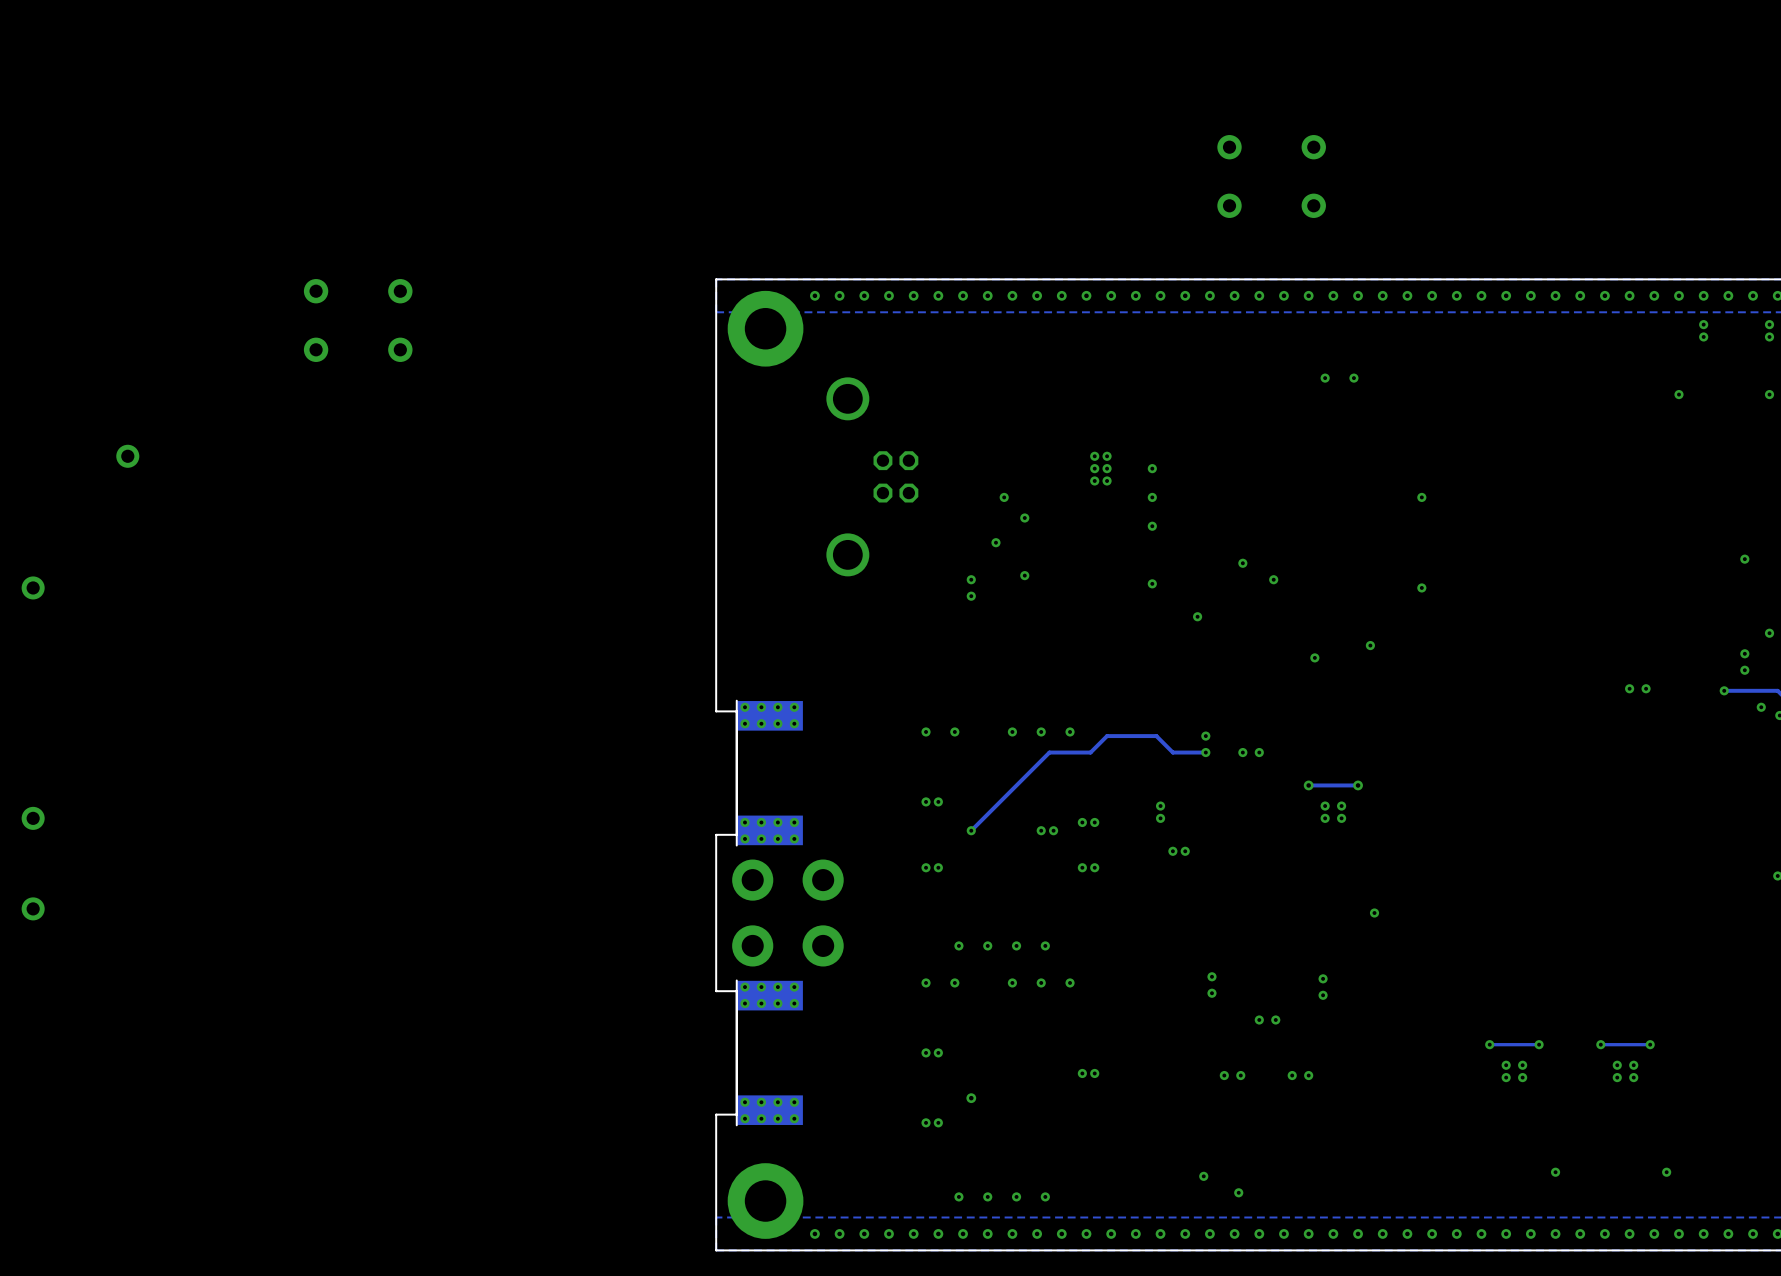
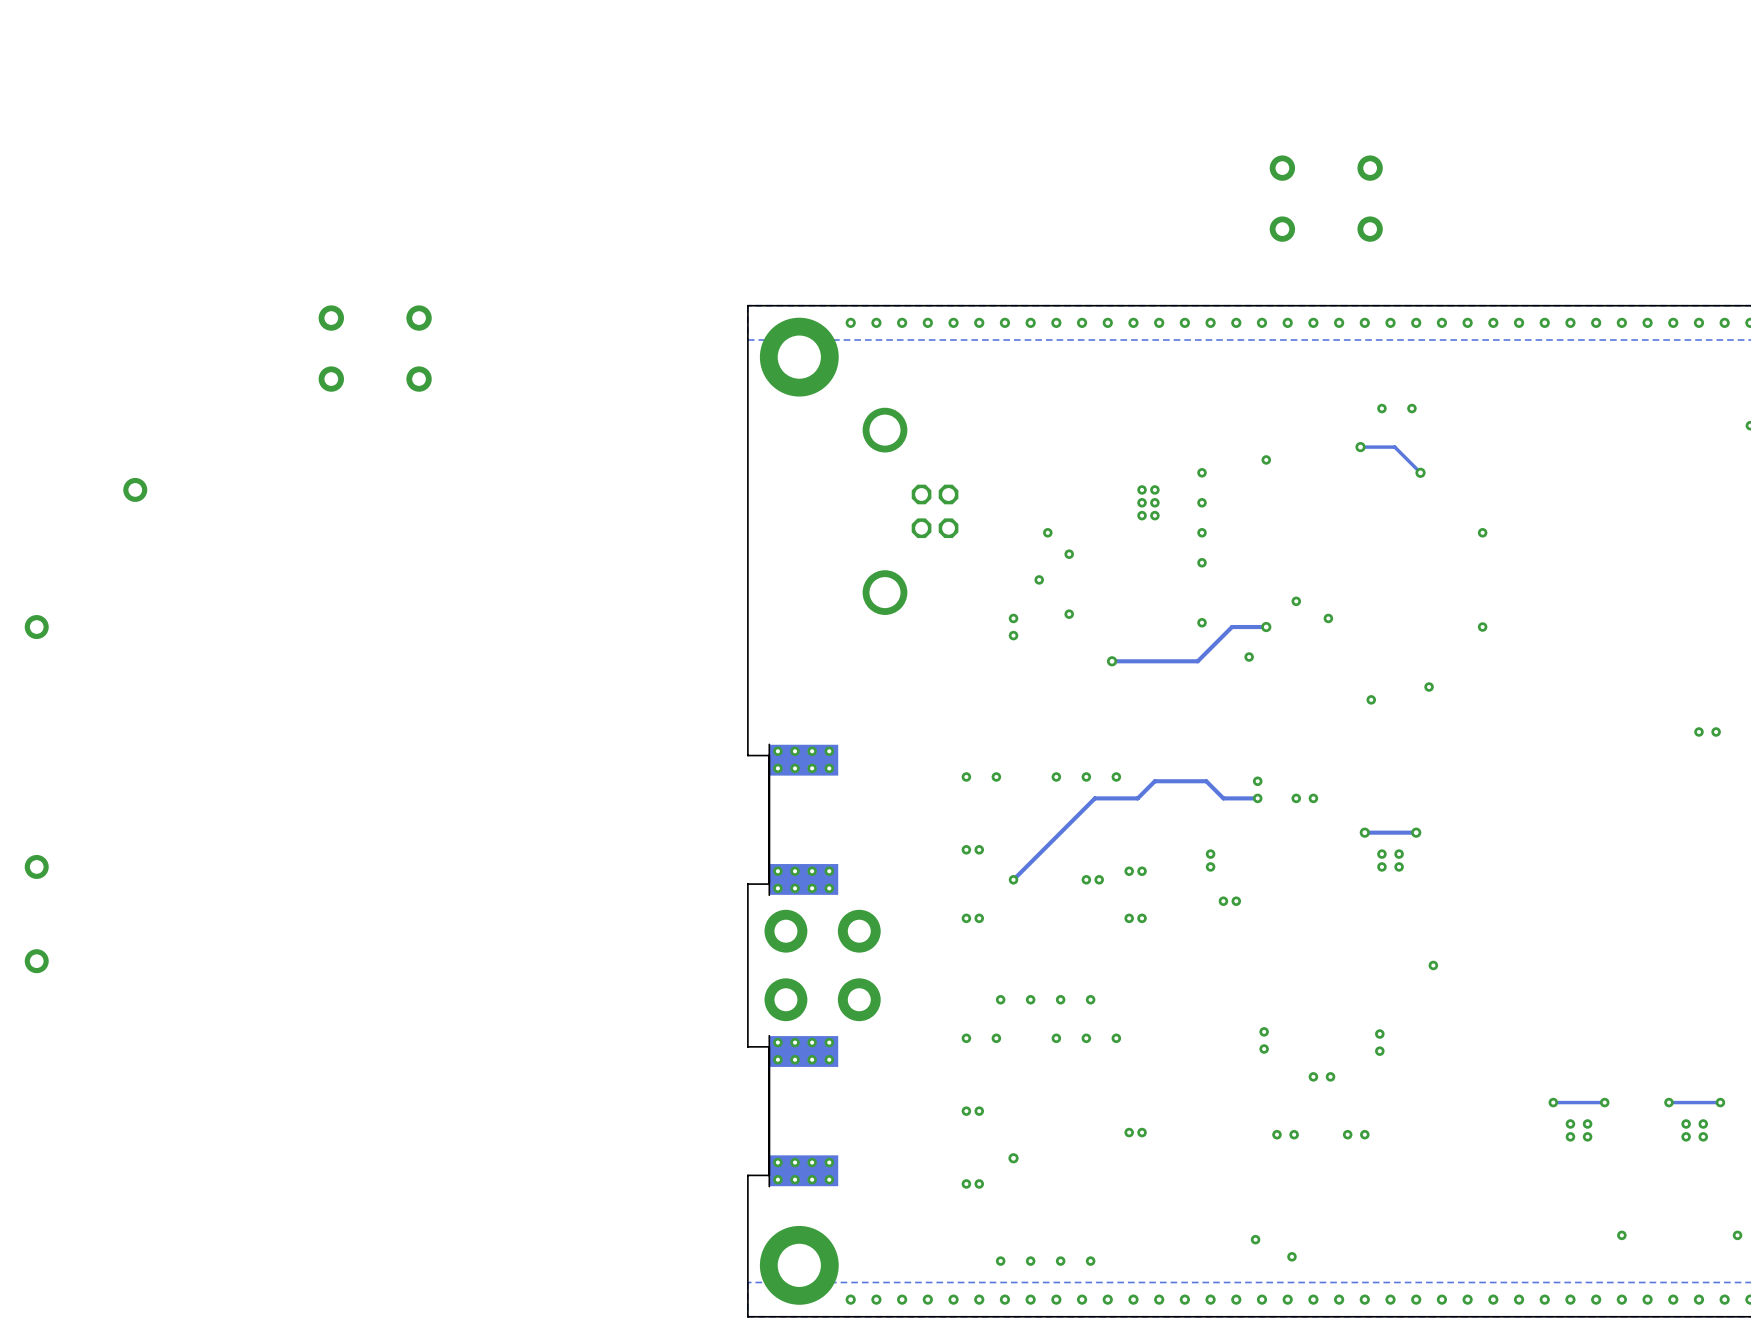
track: none -> (1360, 447) (1394, 447) (1420, 472)
via: none -> (1360, 447)
via: none -> (1266, 459)
via: none -> (1202, 472)
via: none -> (1420, 472)
track: none -> (1266, 627) (1232, 627) (1197, 661) (1112, 661)
via: none -> (1266, 627)
via: none -> (1112, 661)

